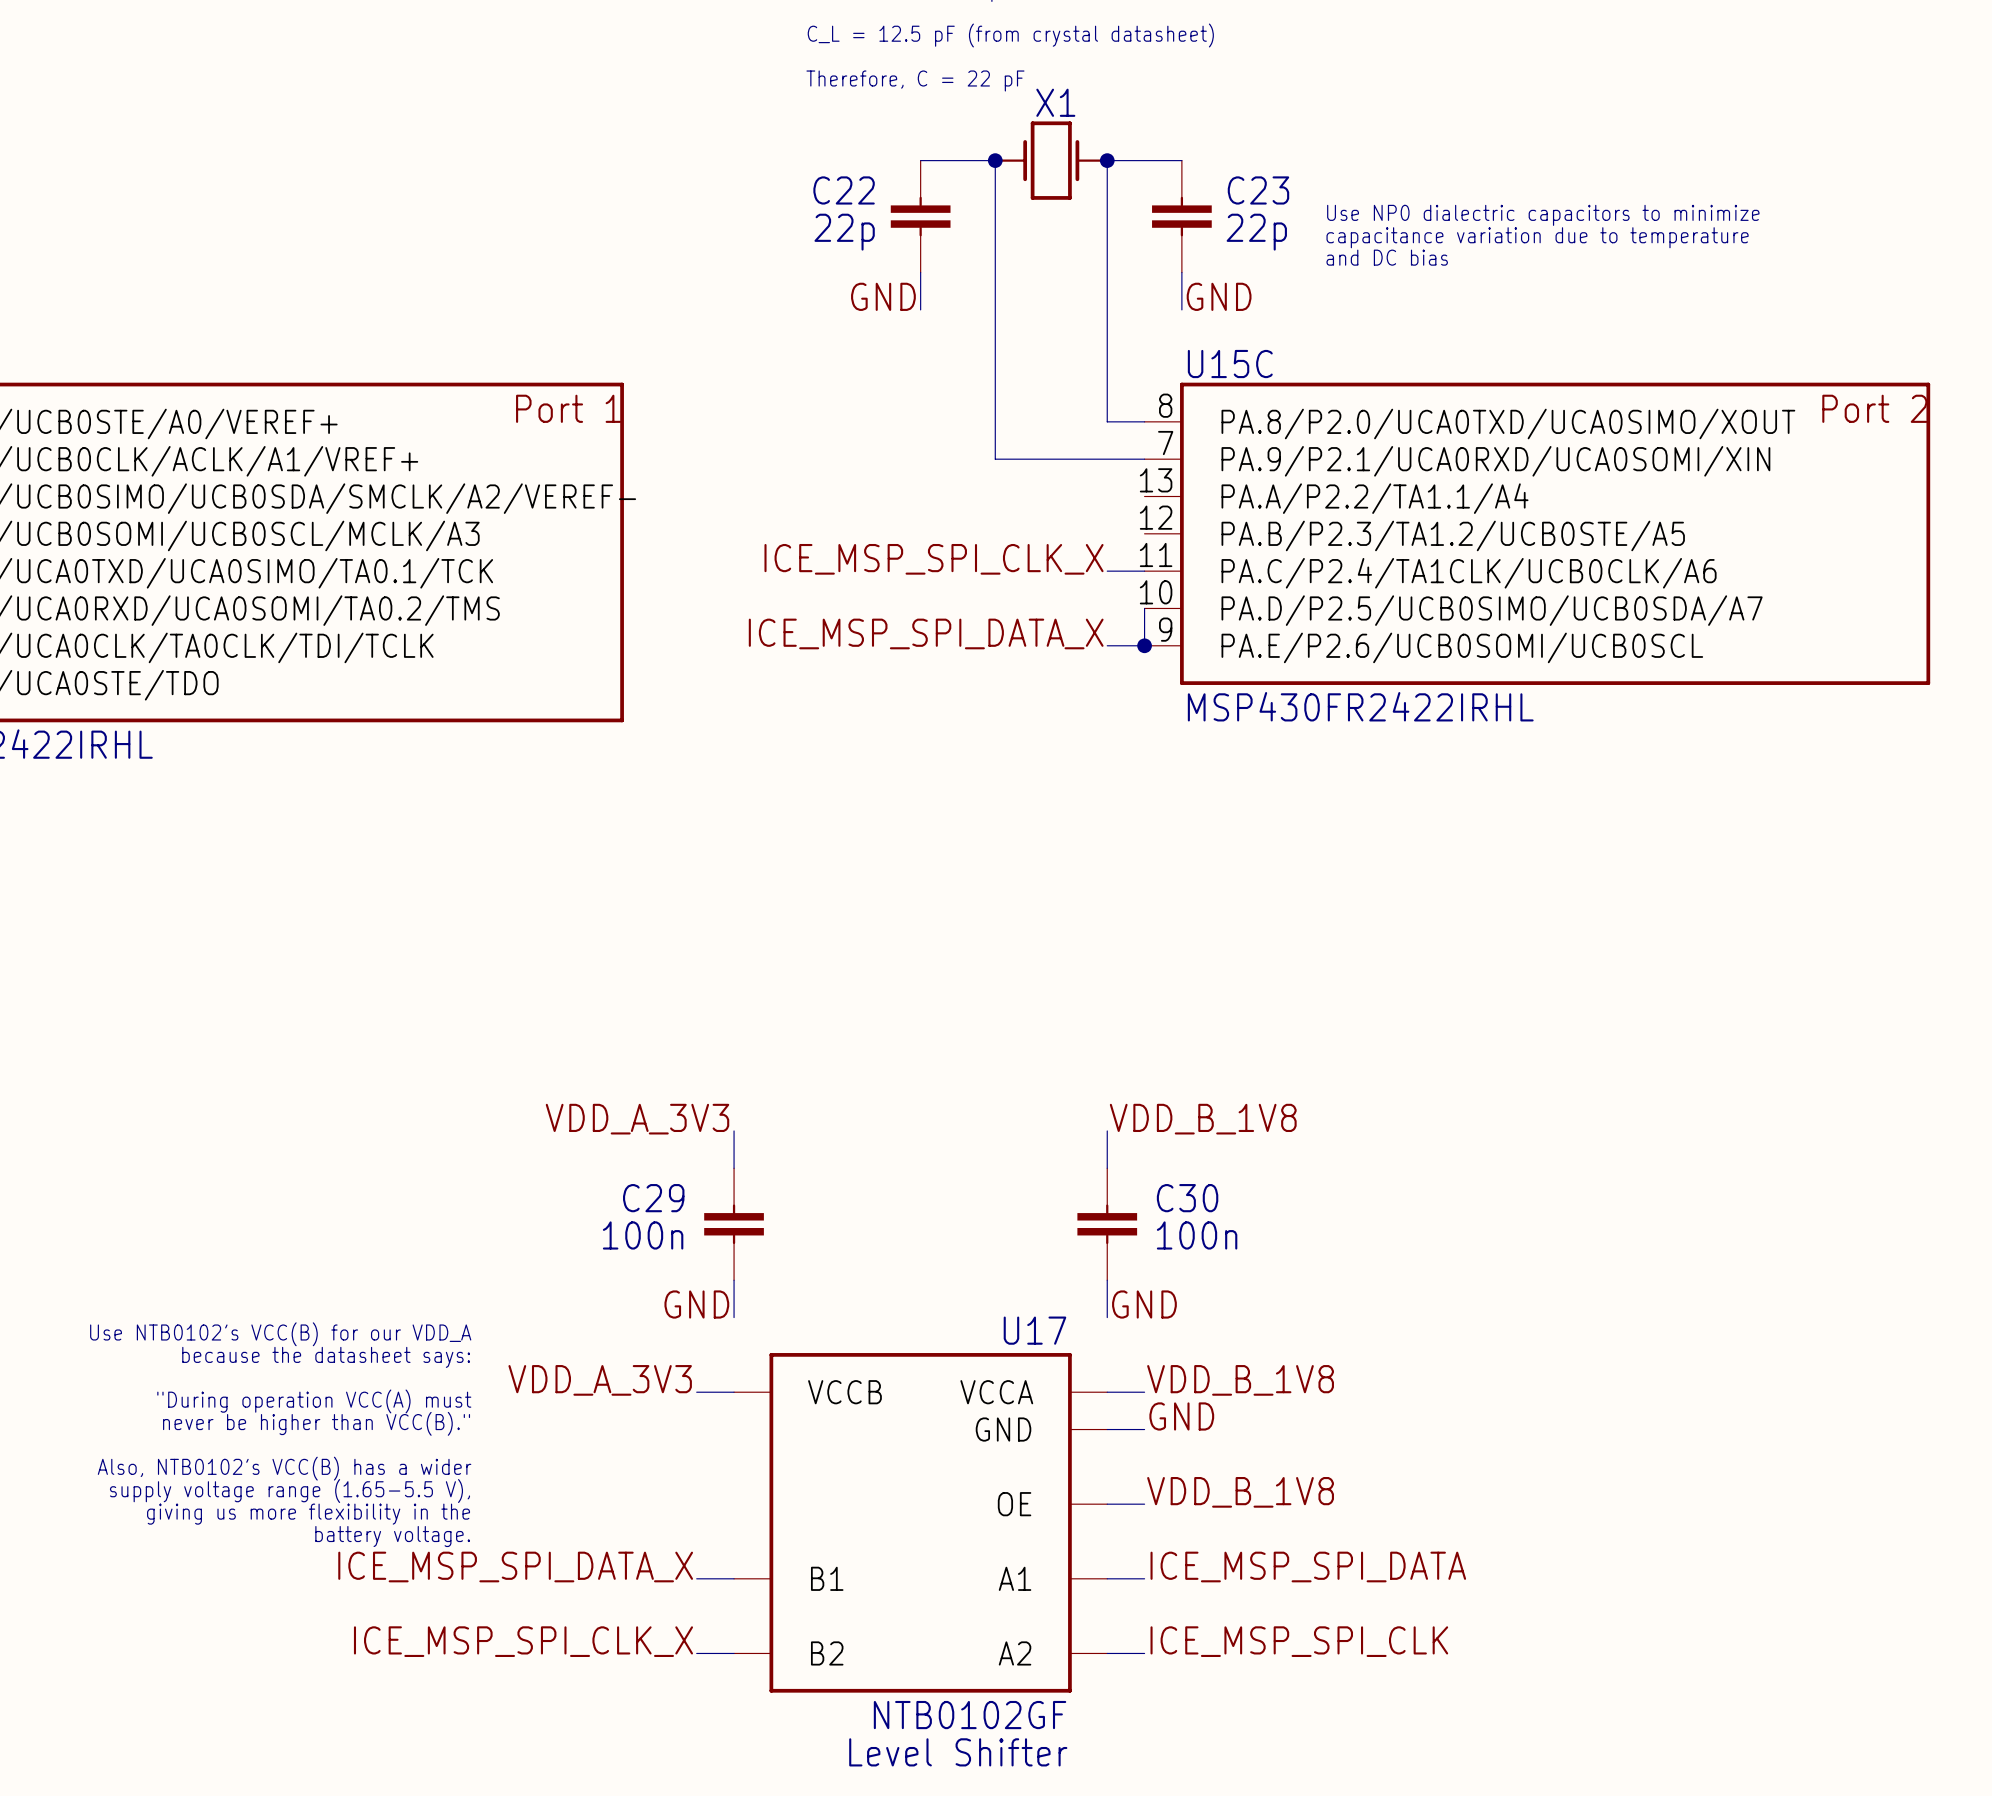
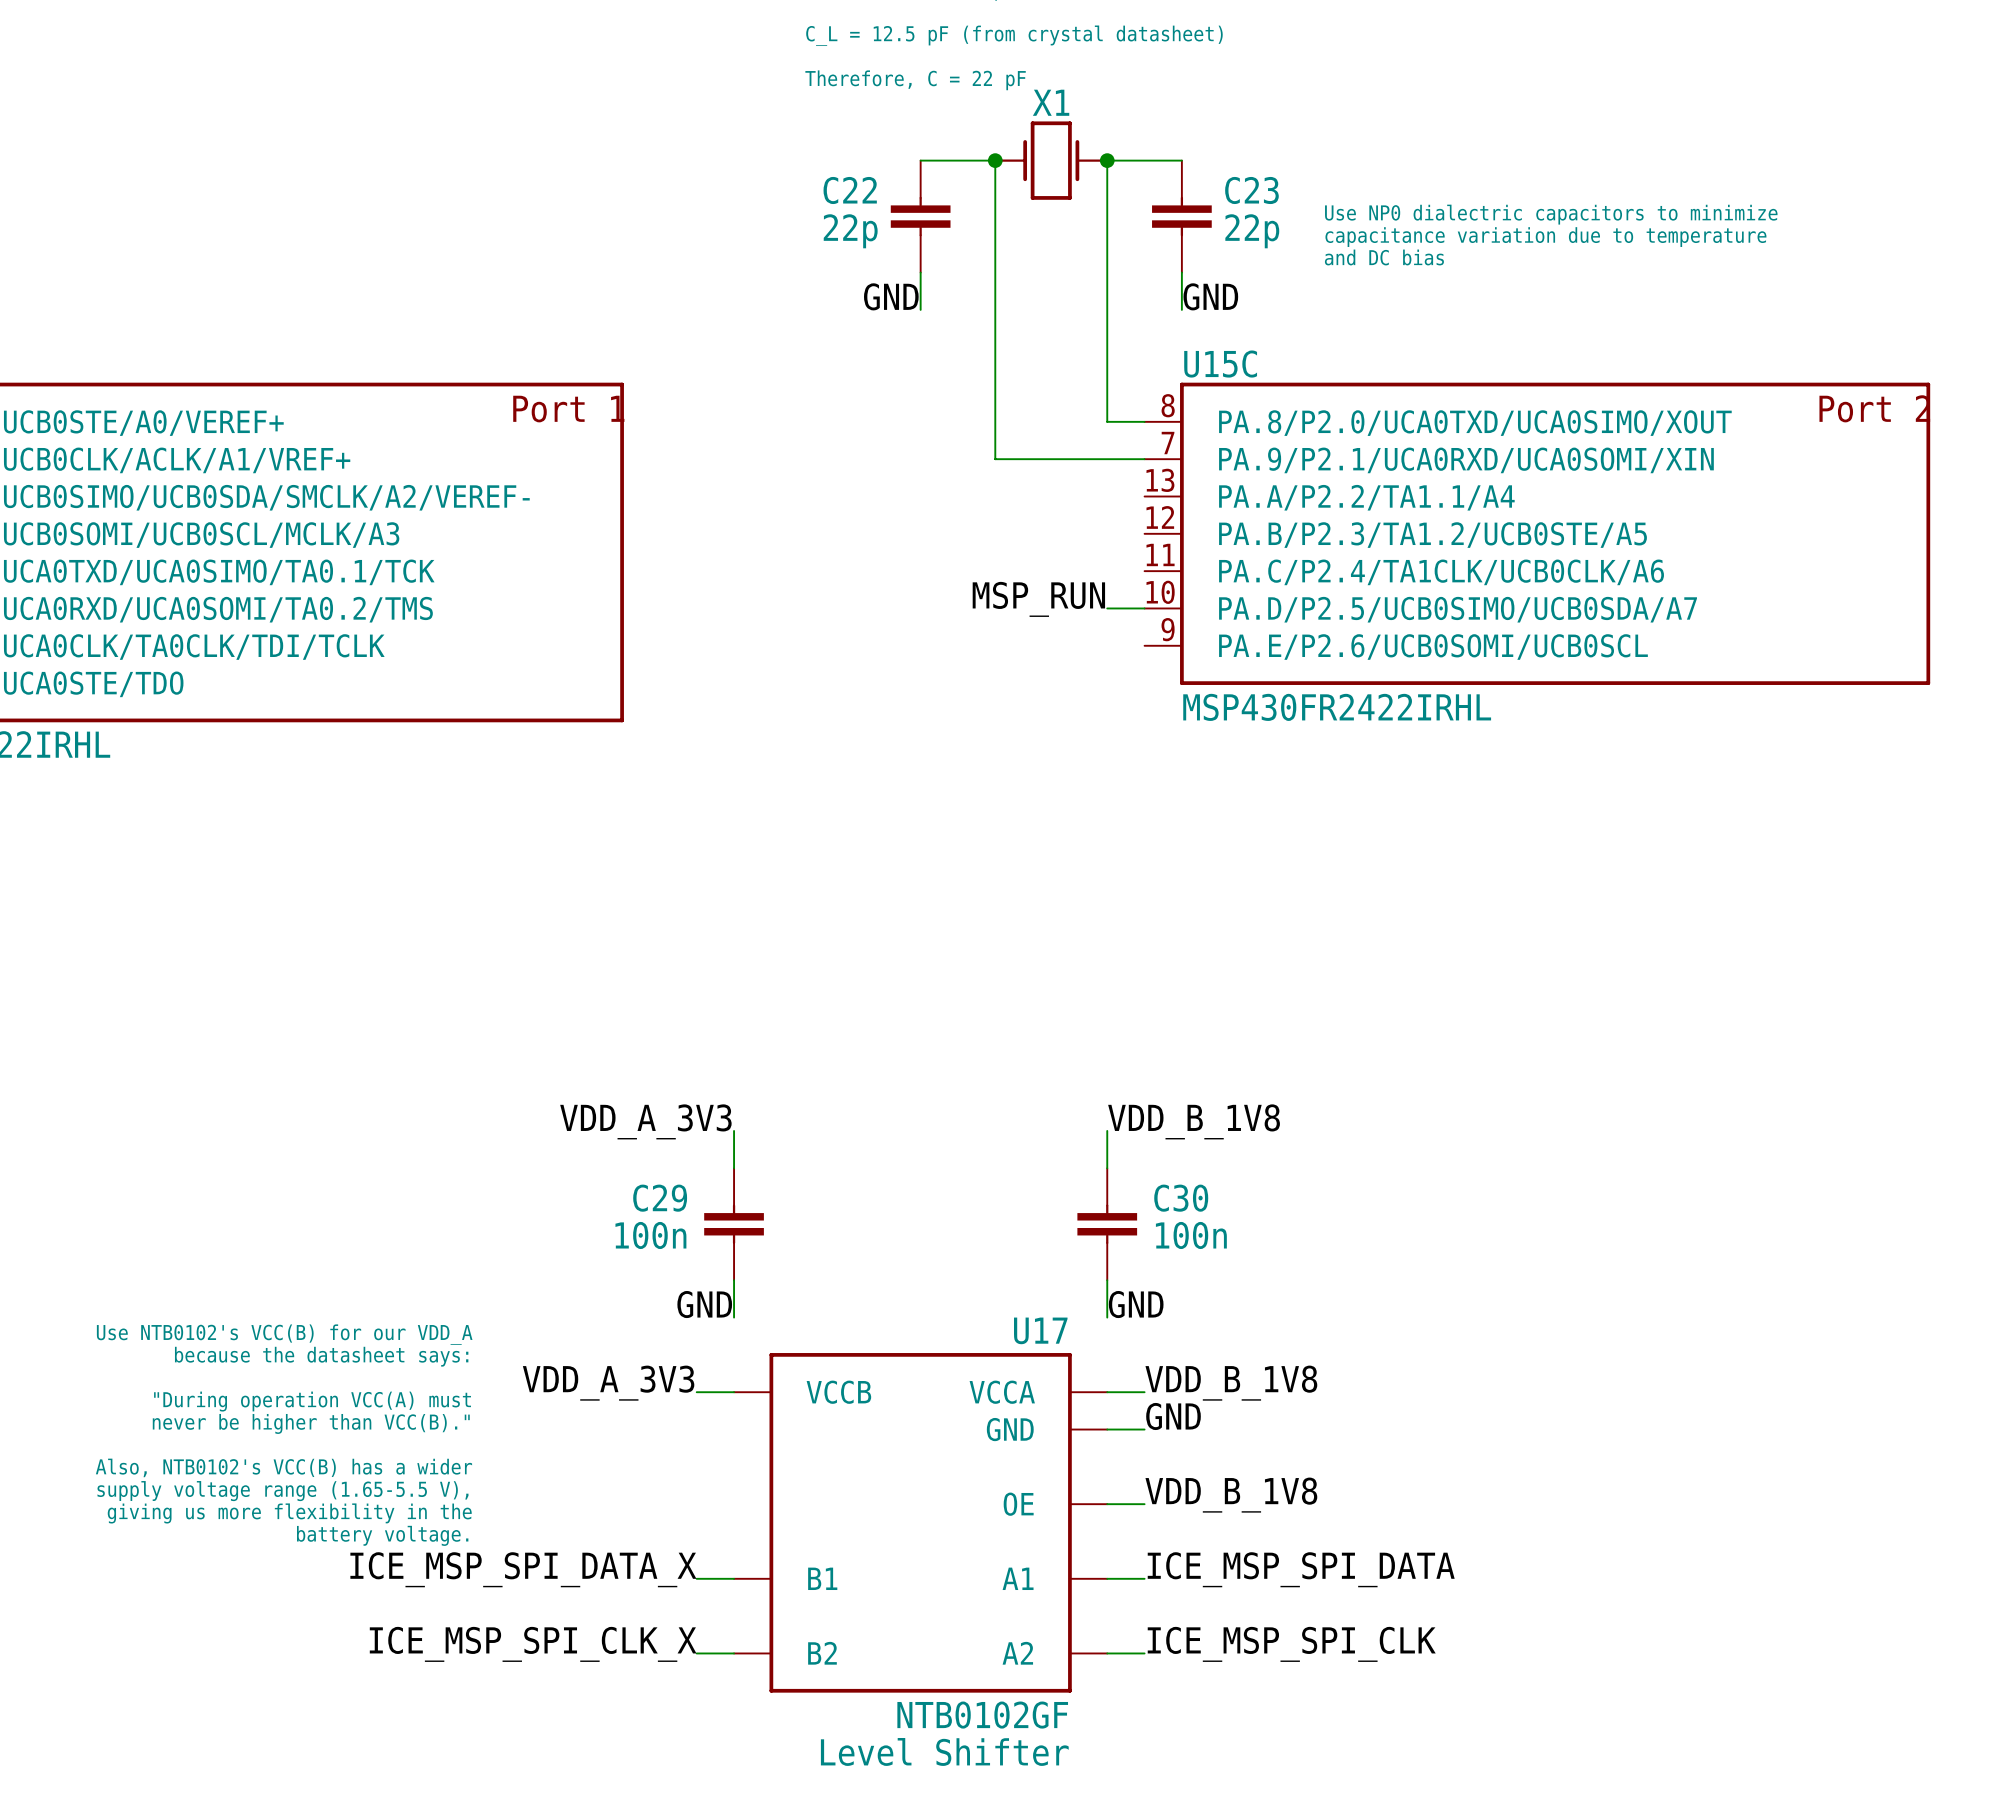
label: ICE_MSP_SPI_CLK_X (934, 559) -> none
wire: (1107, 571) (1144, 571) -> none
label: none -> MSP_RUN (1038, 599)
wire: (1144, 608) (1144, 645) (1107, 645) -> (1144, 608) (1107, 608)
label: ICE_MSP_SPI_DATA_X (926, 633) -> none
junction: (1144, 645) -> none

